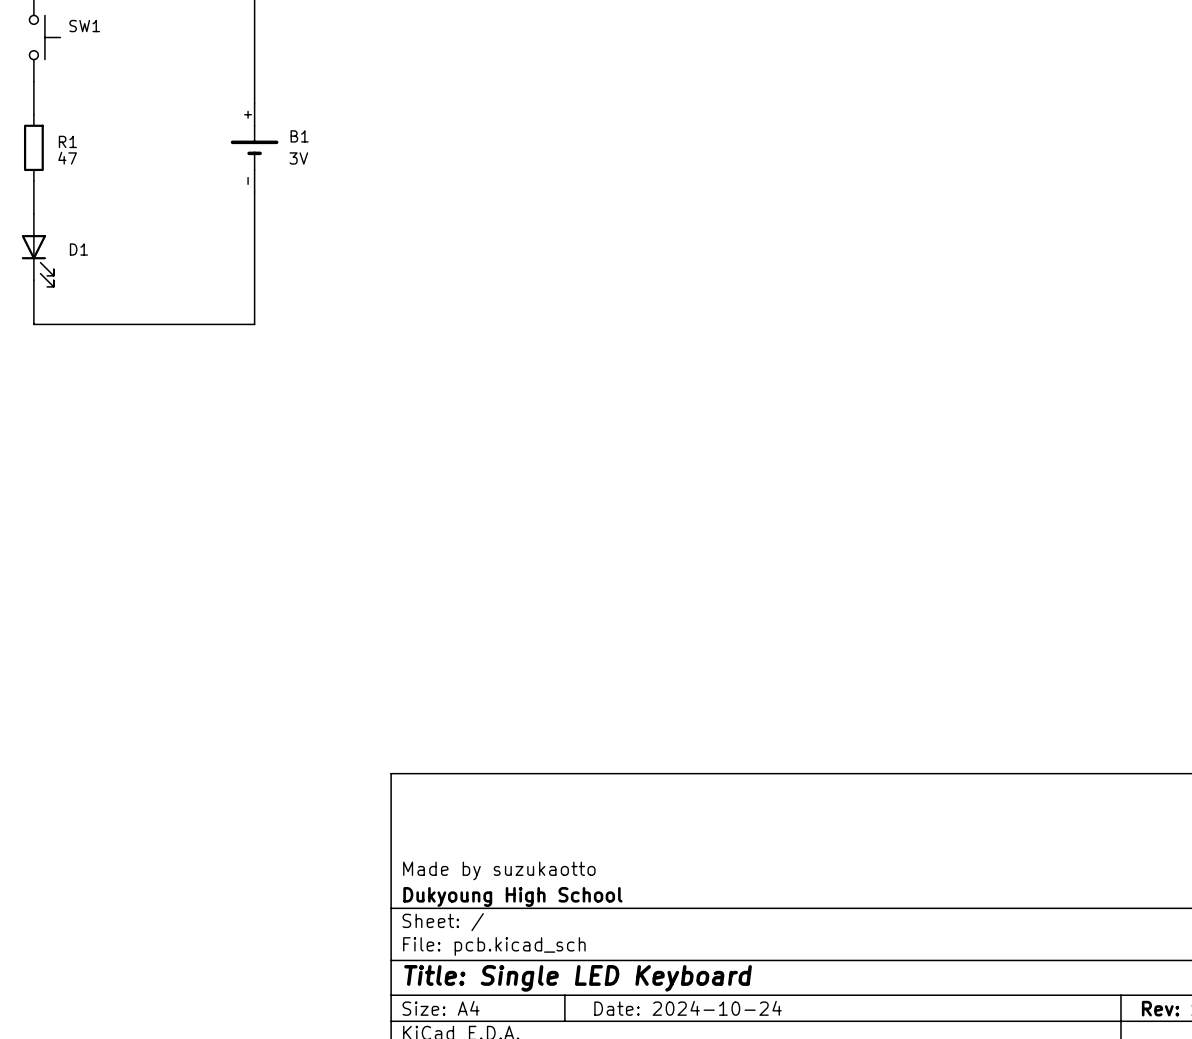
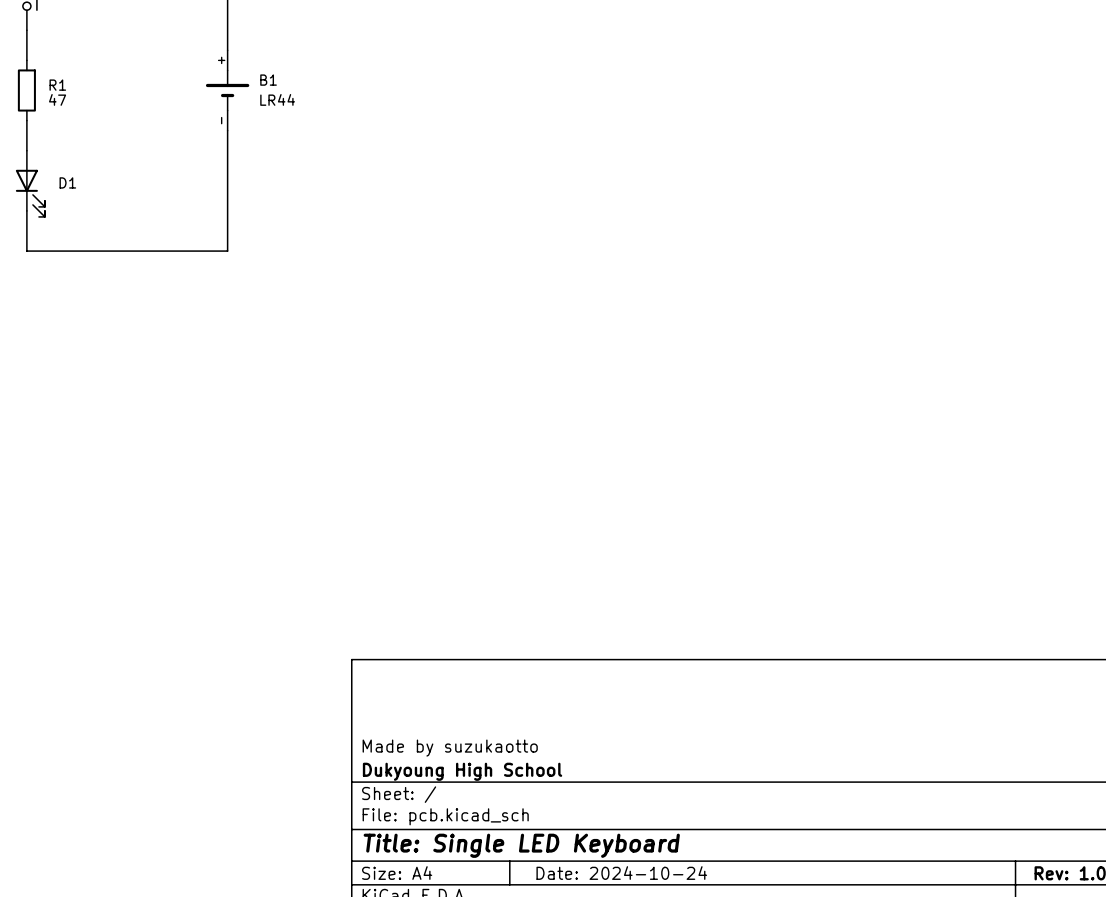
B1 value: 3V (298, 158) -> LR44 (277, 99)

